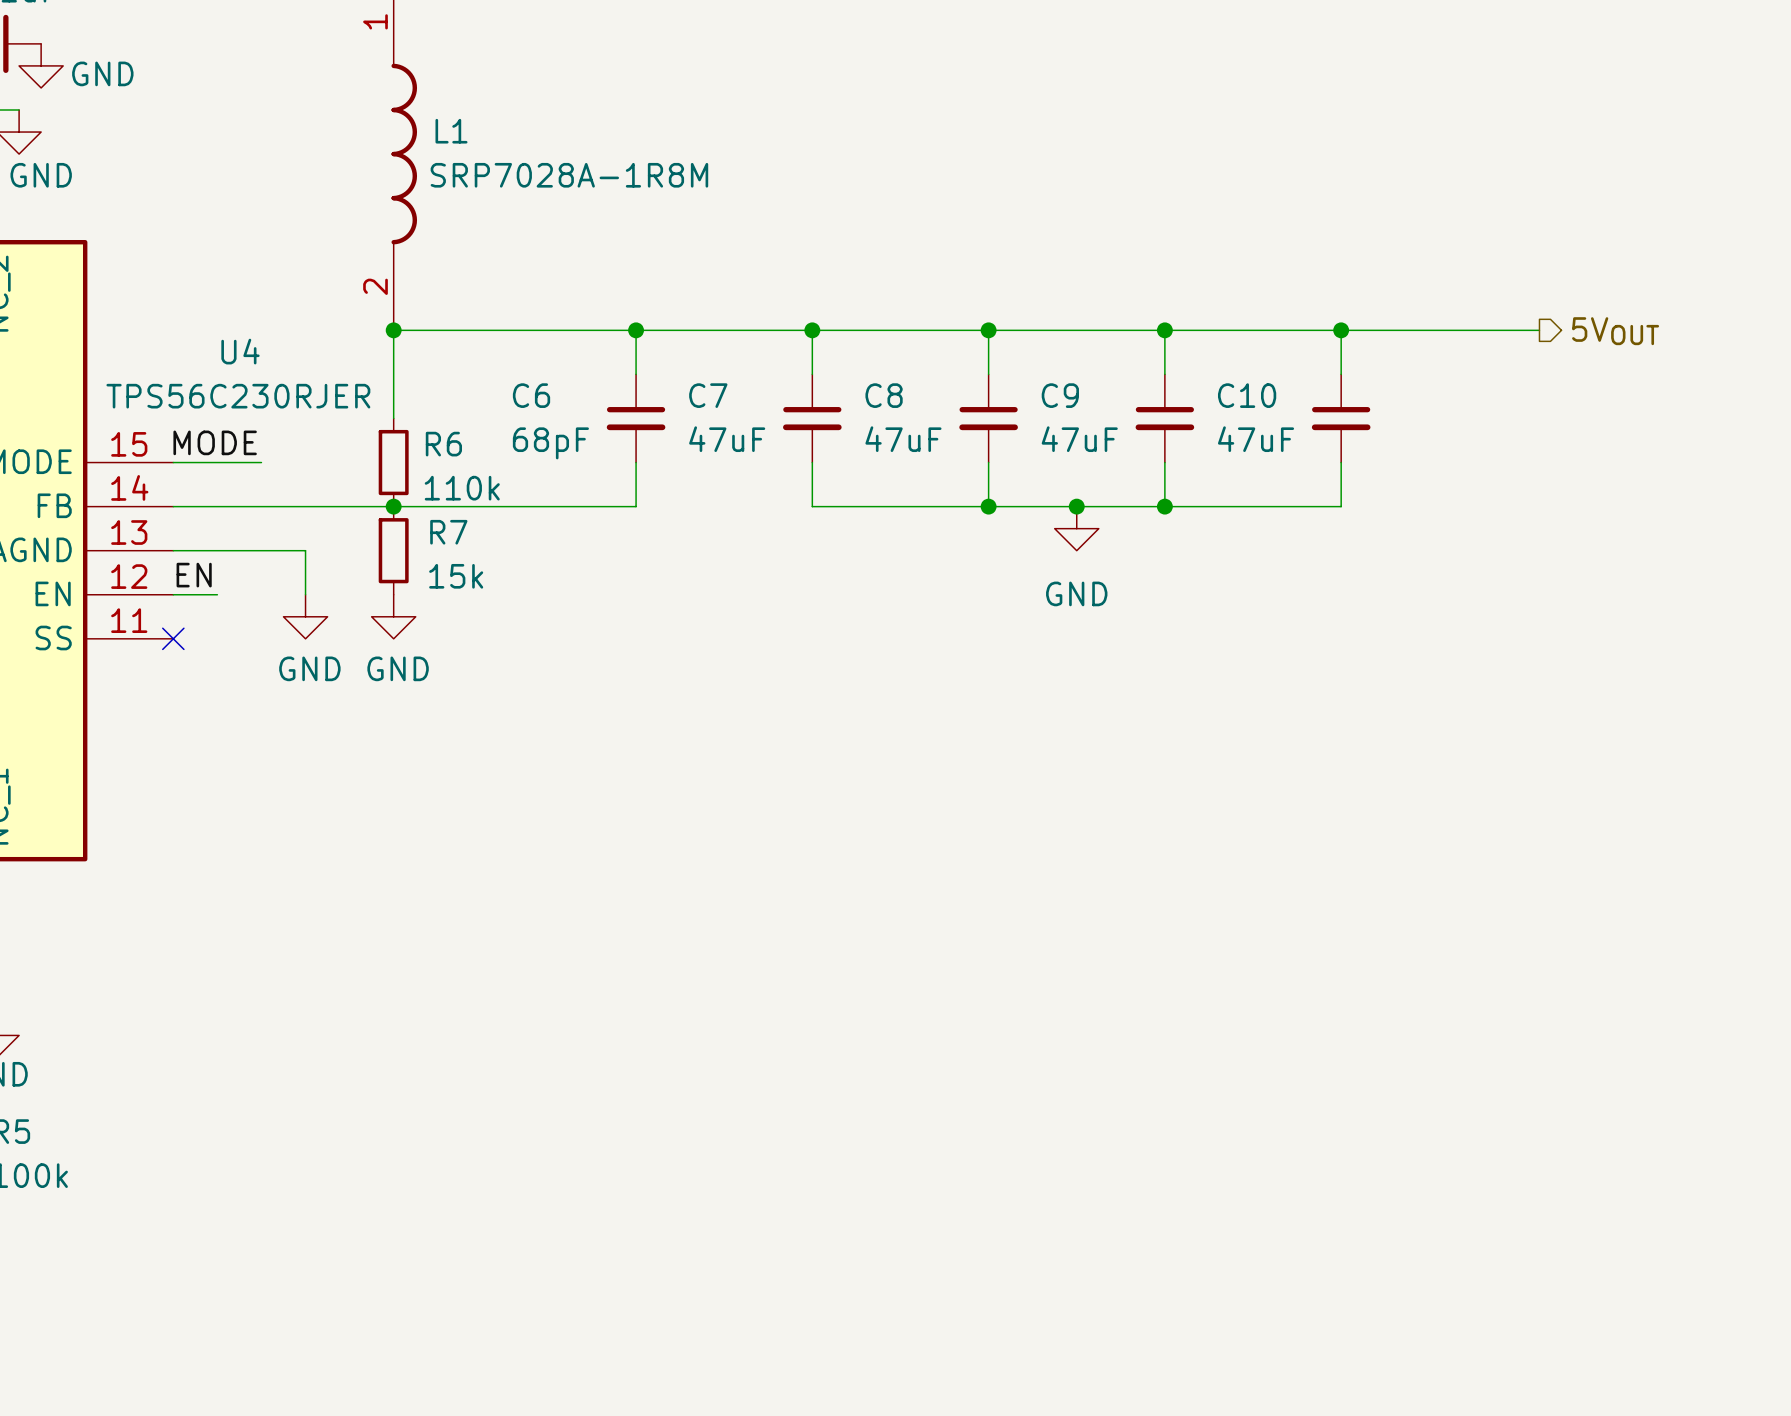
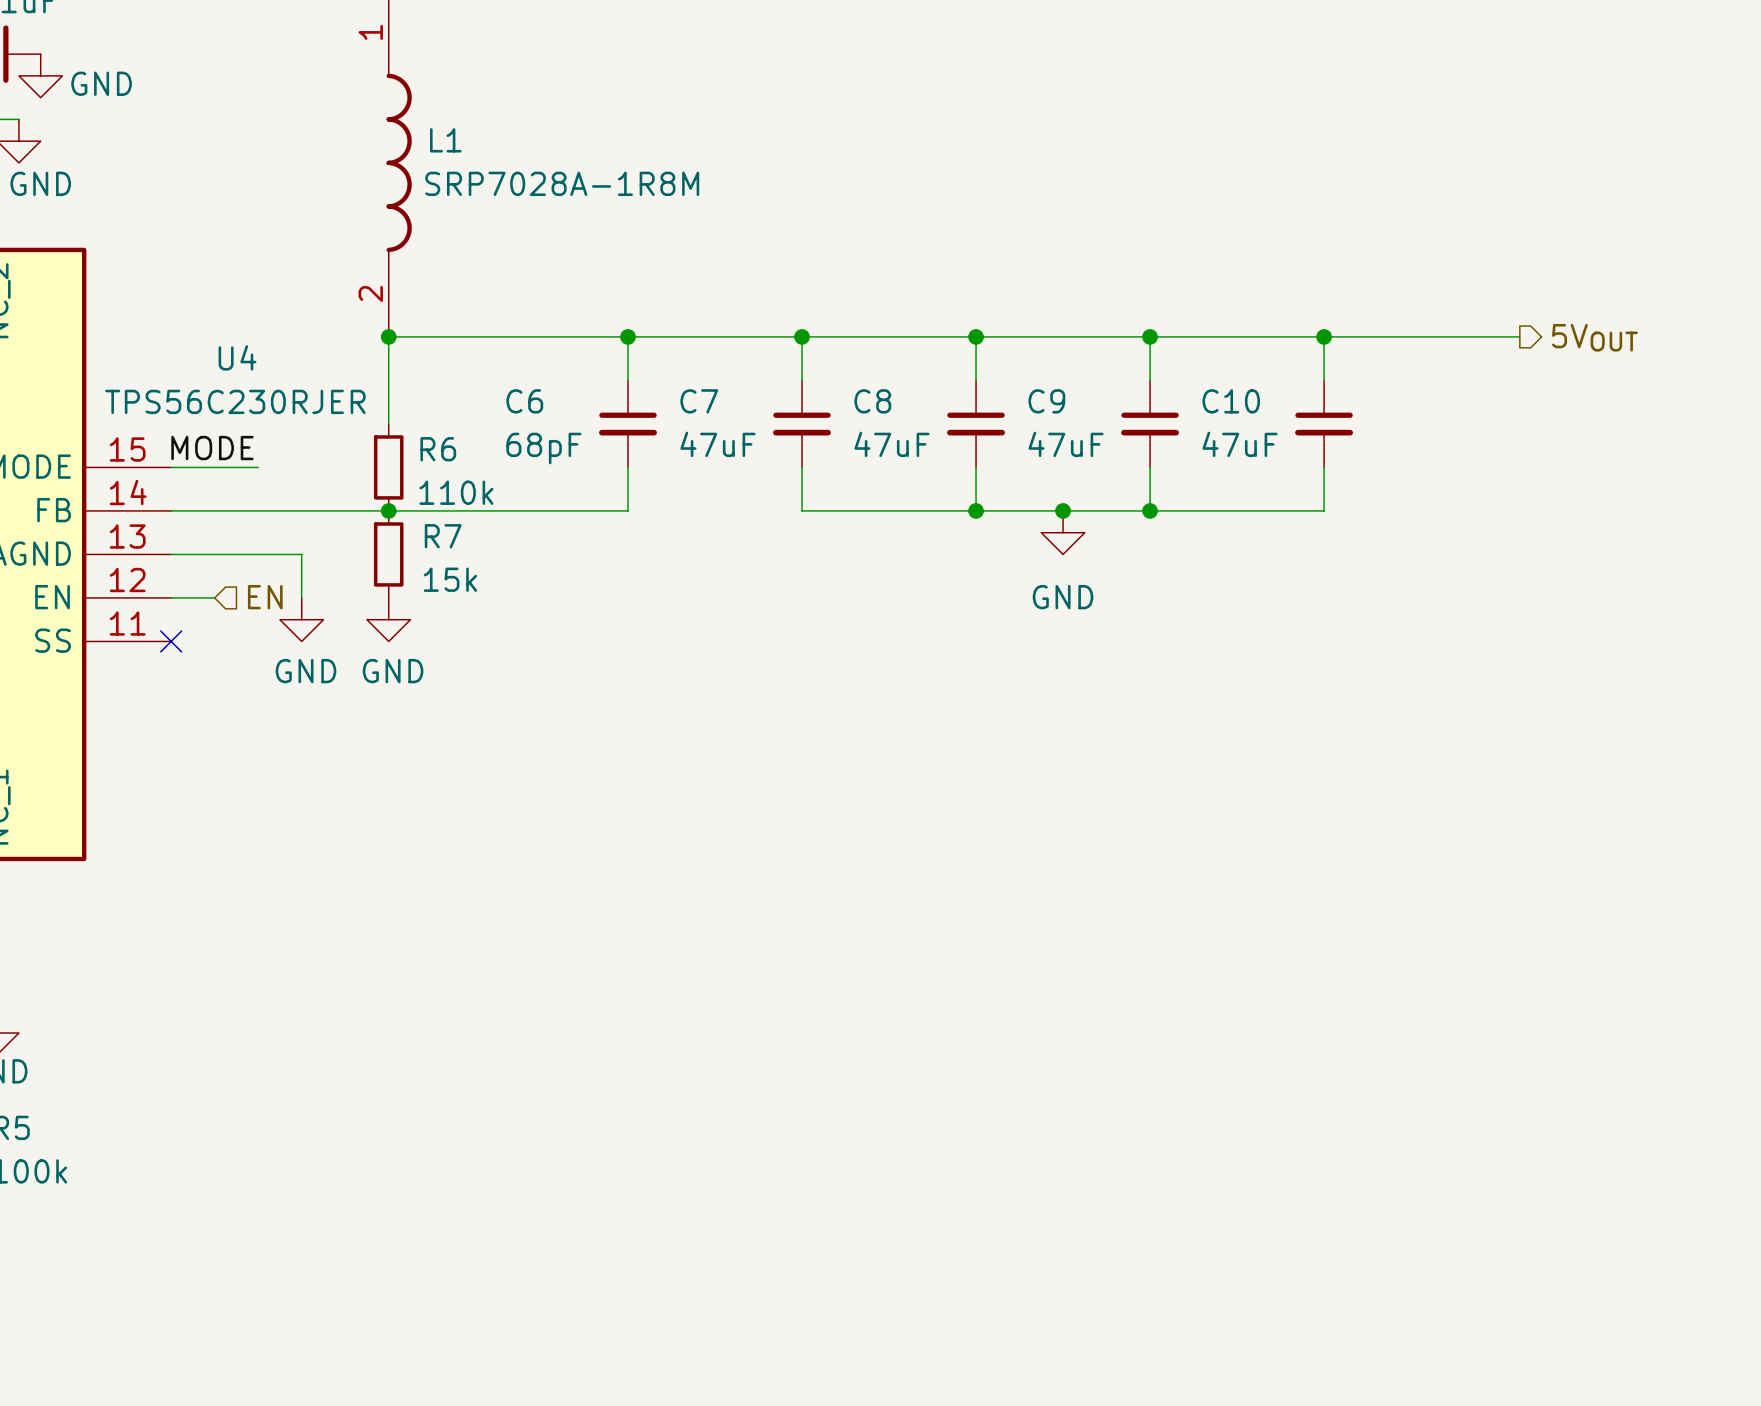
label: EN (194, 575) -> none
hierarchical label: none -> EN (265, 597)

